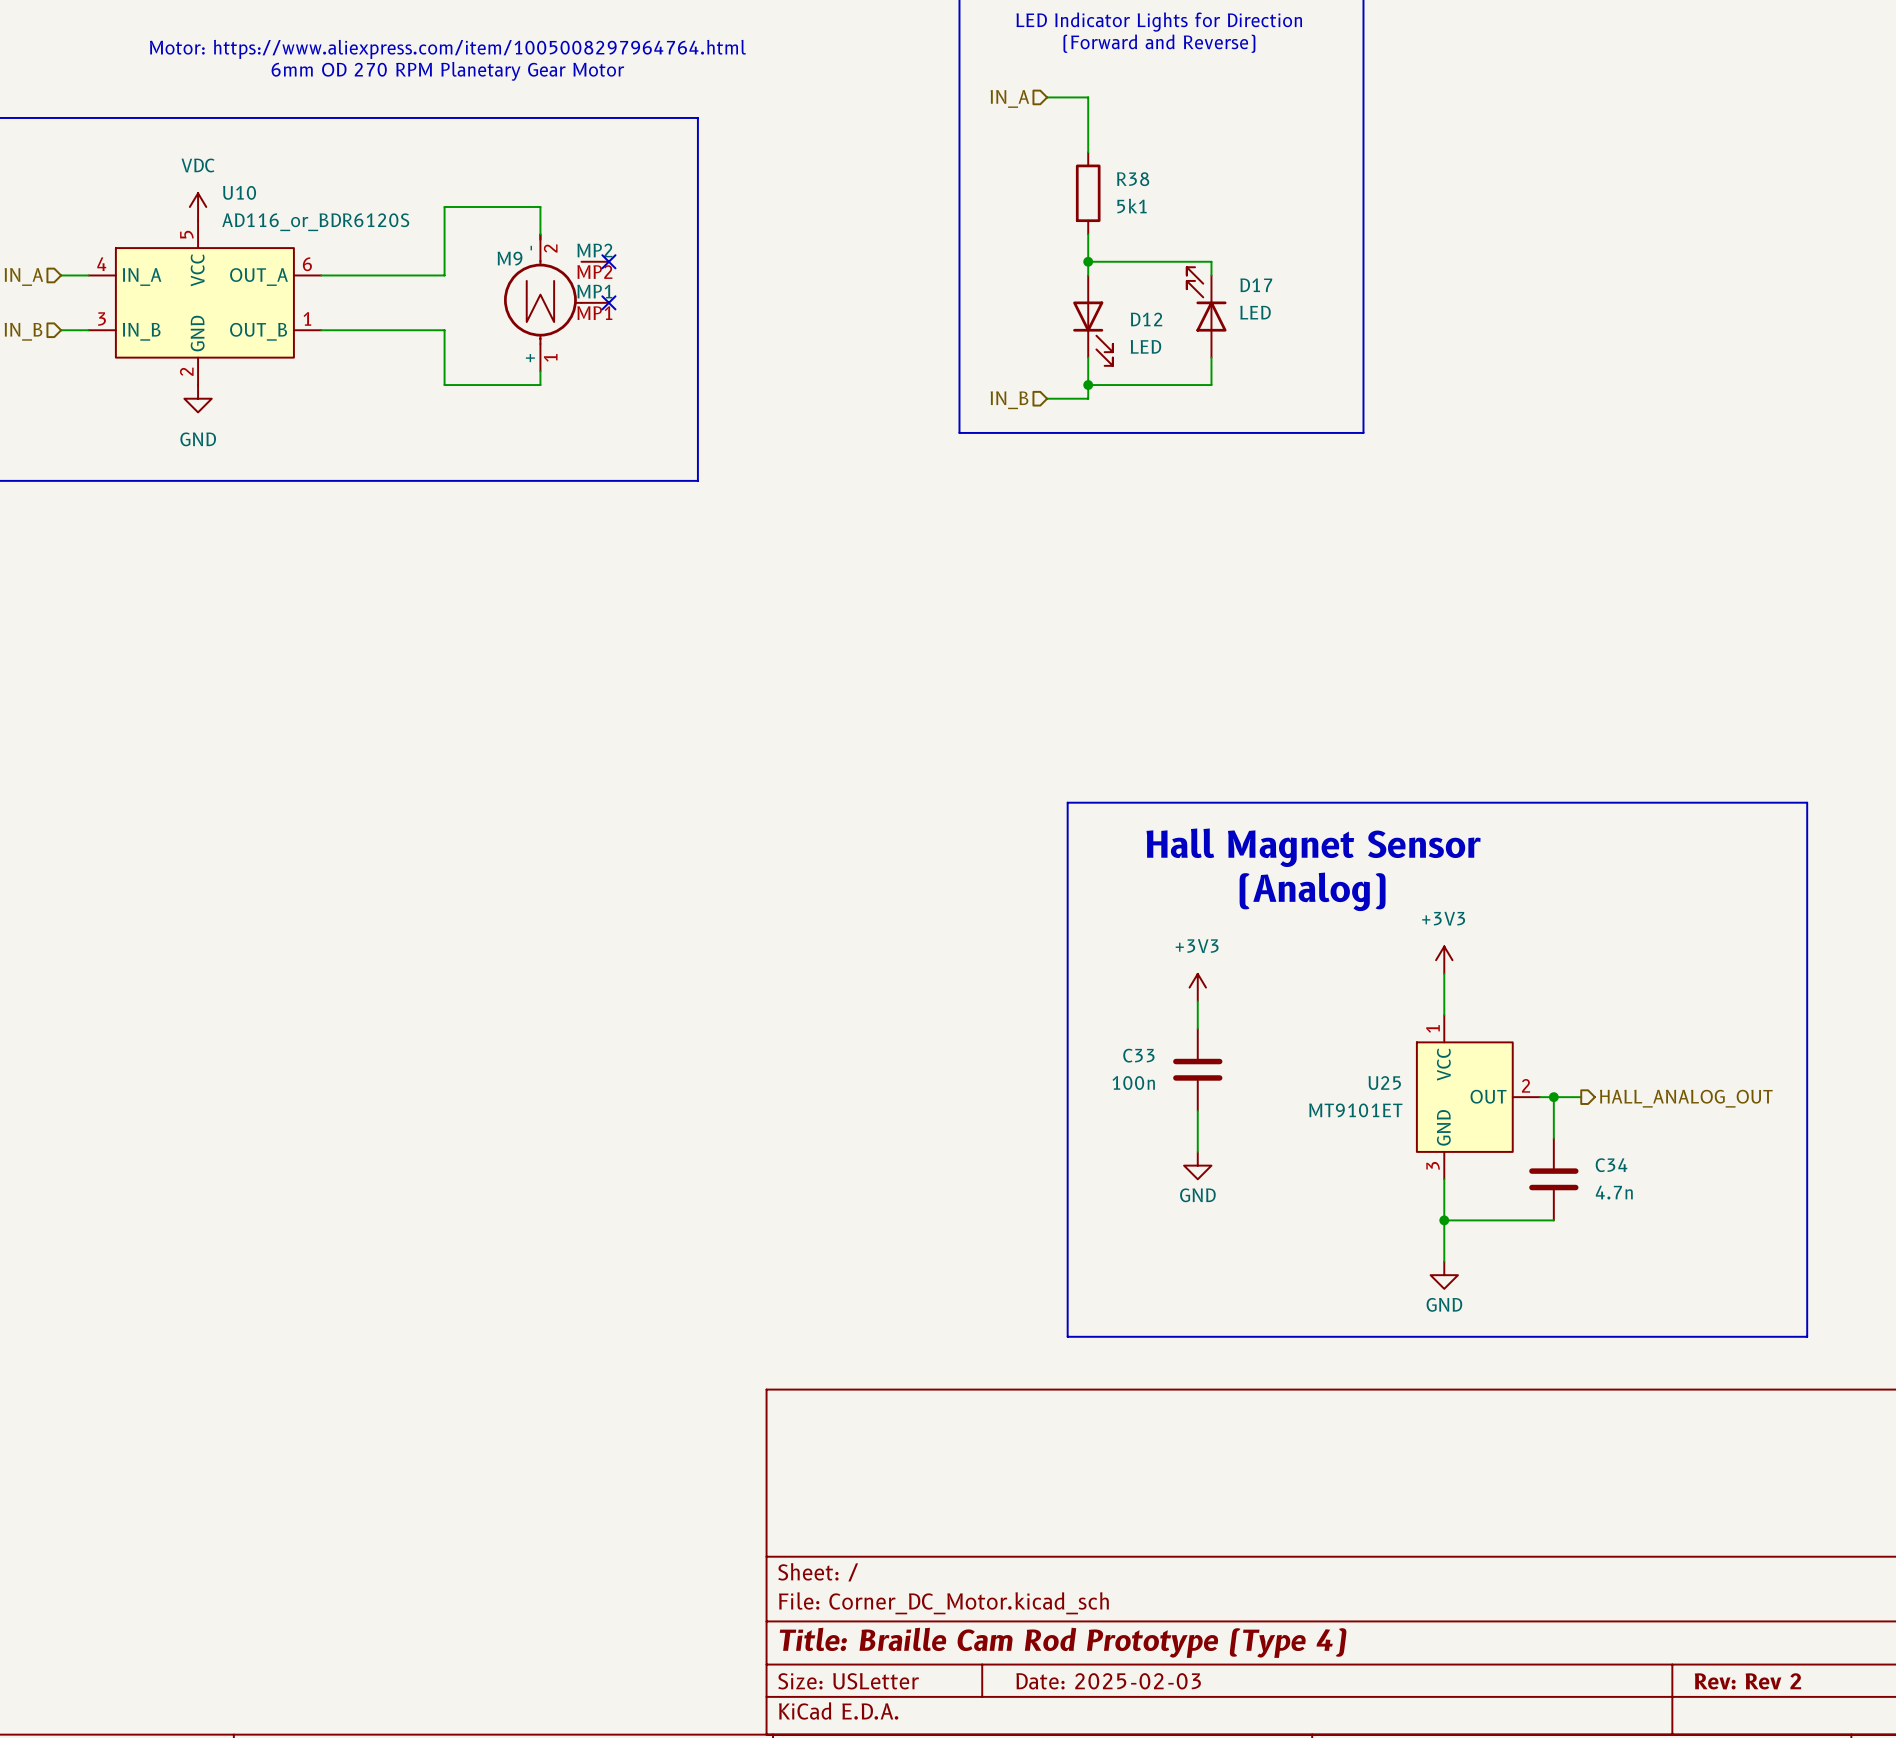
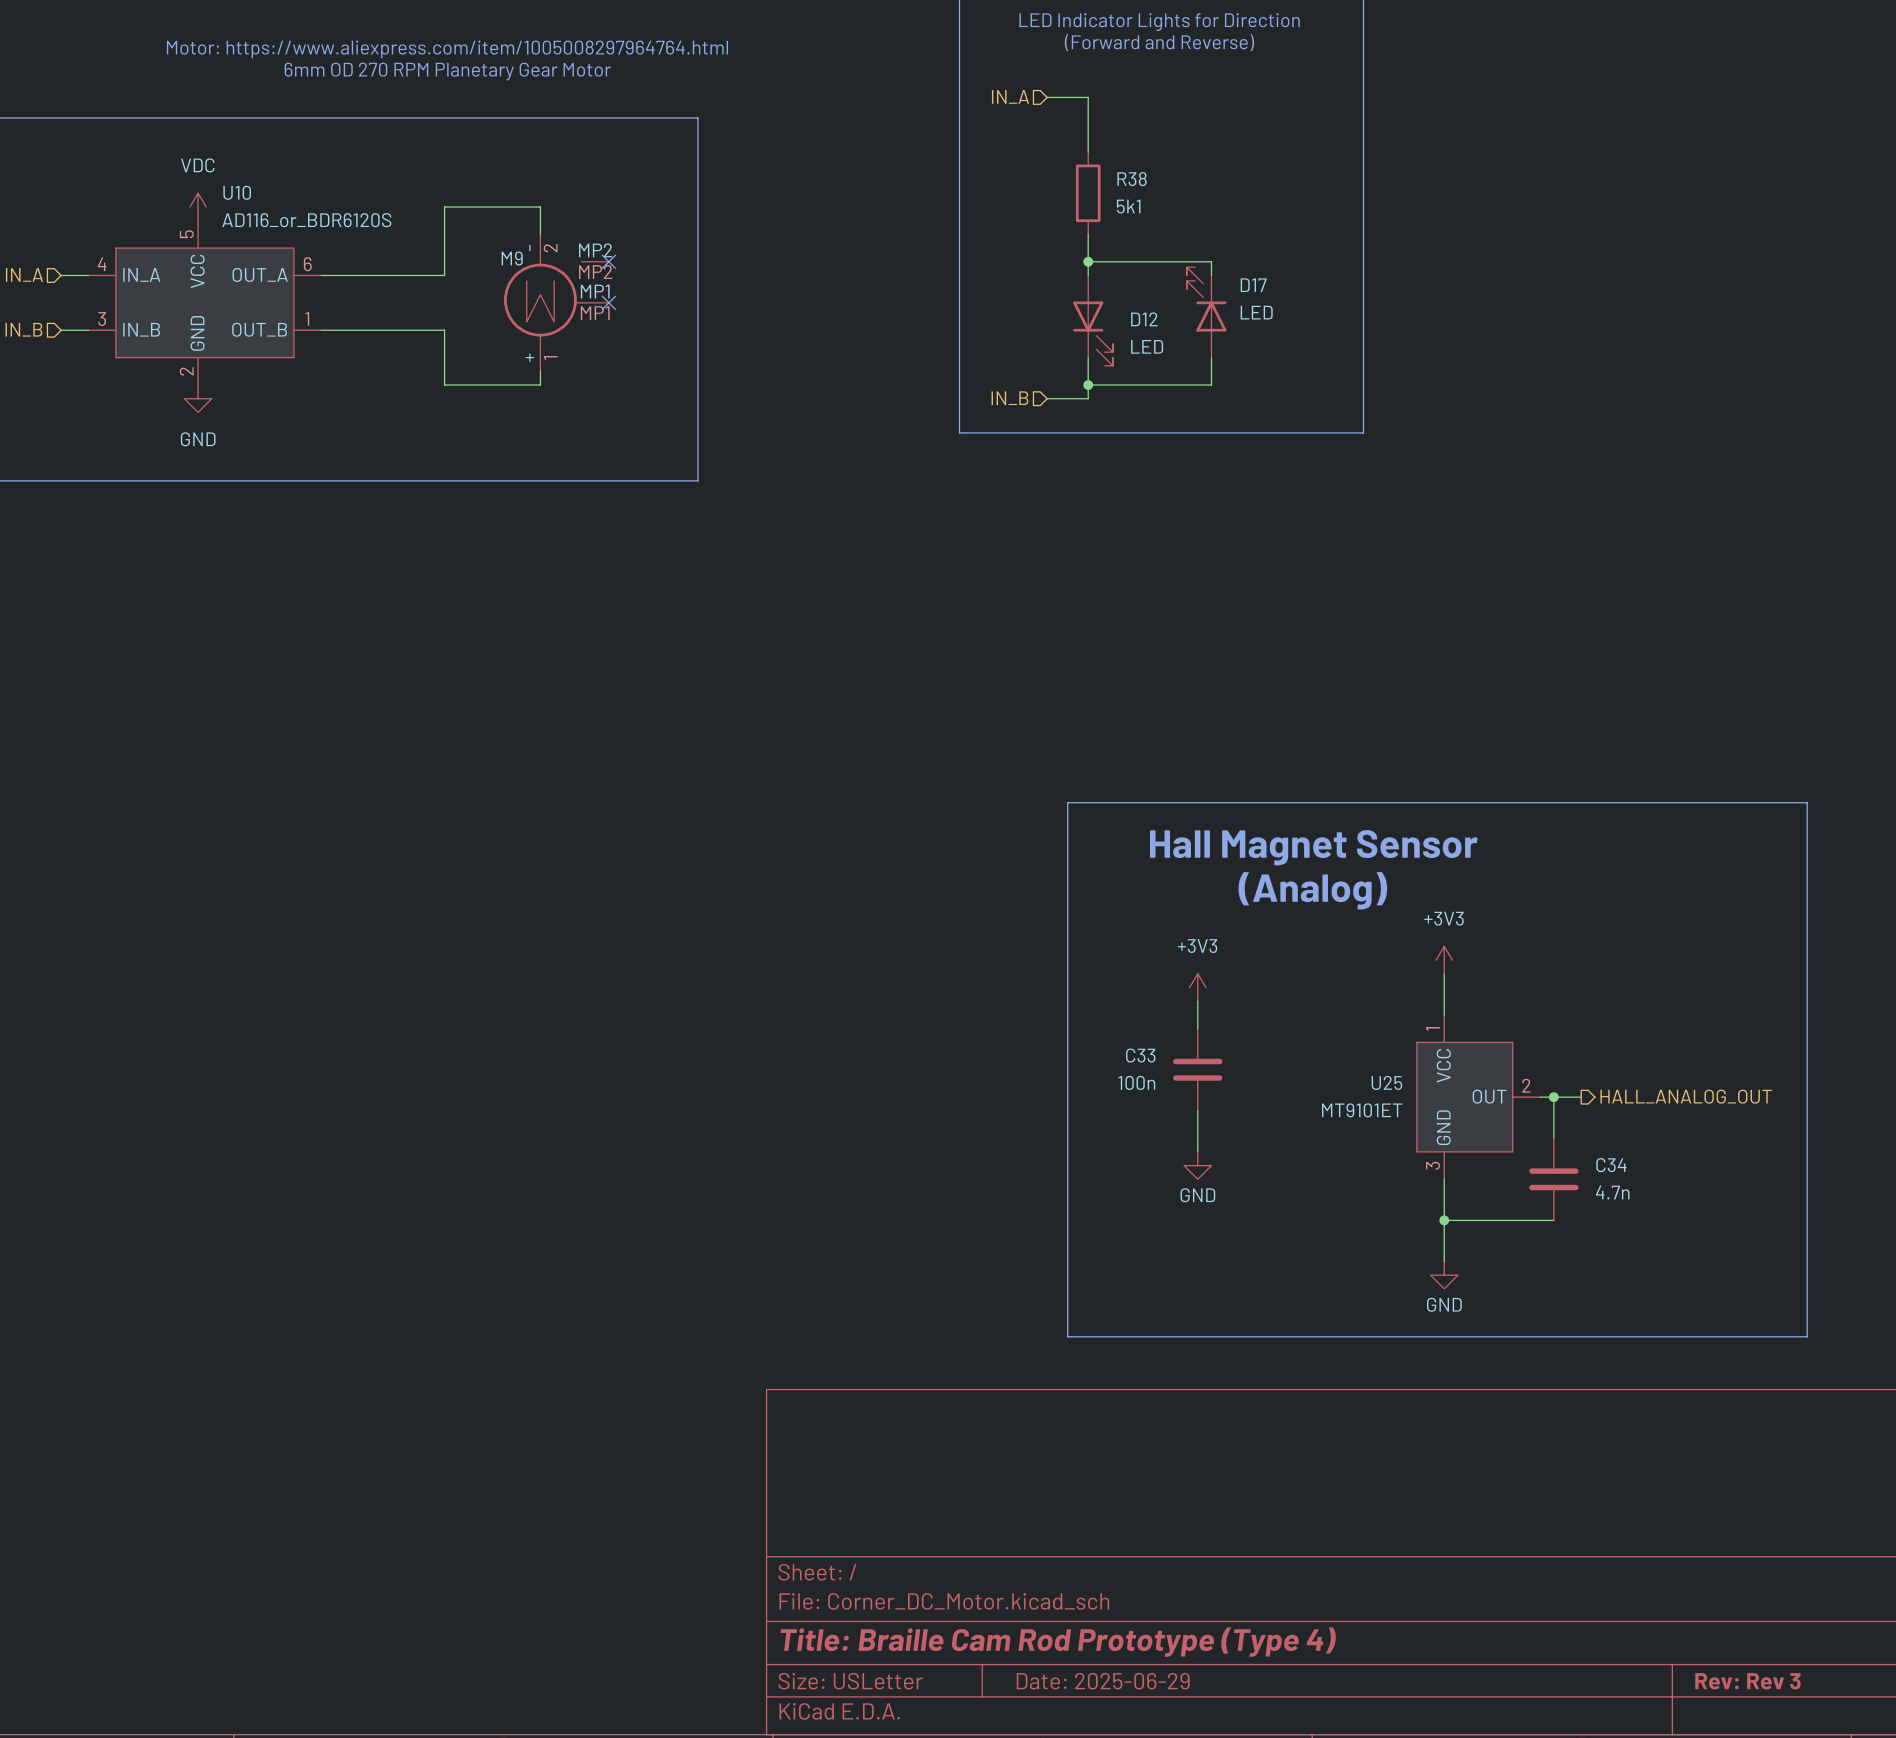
title block: Date: 2025-02-03 (1108, 1681) -> Date: 2025-06-29 (1103, 1681)
title block: Rev: Rev 2 (1747, 1681) -> Rev: Rev 3 (1748, 1681)

